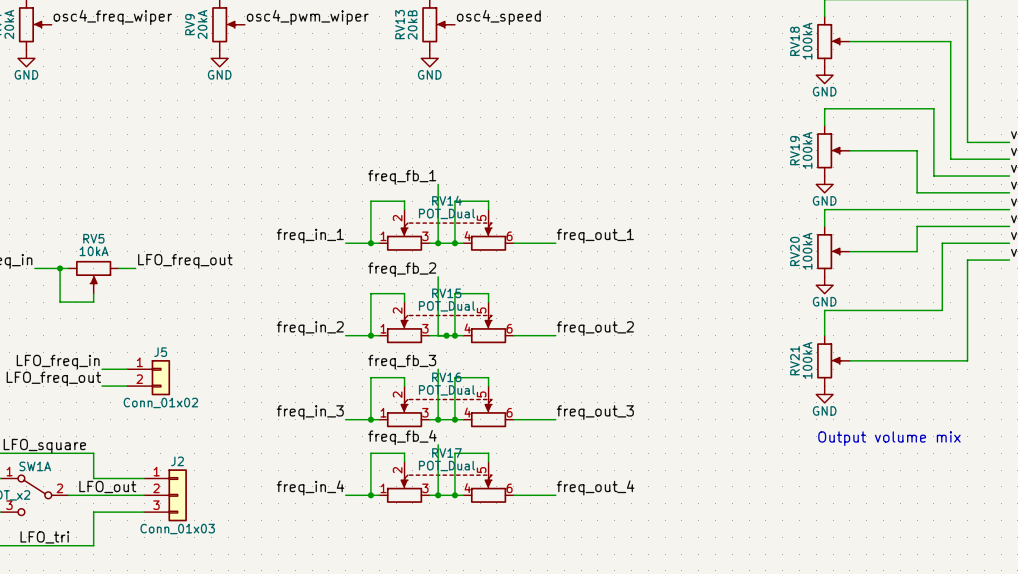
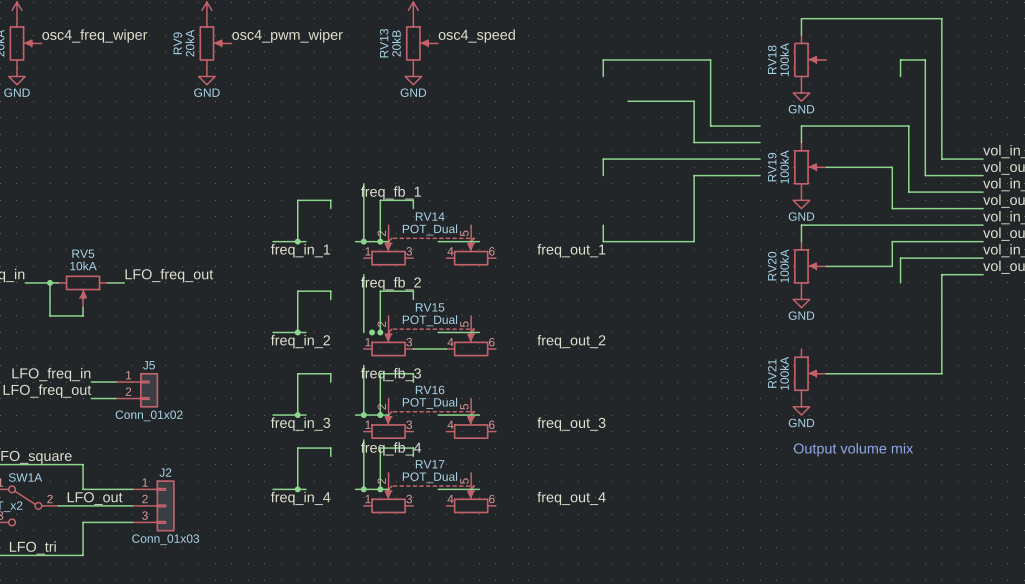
wire: (849, 41) (925, 41) -> (900, 76) (900, 59)
wire: none -> (603, 76) (603, 59) (710, 59) (710, 126) (760, 126)
wire: none -> (628, 101) (694, 101) (694, 142) (760, 142)
wire: none -> (760, 159) (603, 159) (603, 175)
wire: none -> (760, 175) (694, 175) (694, 241) (603, 241) (603, 225)
wire: (438, 184) (438, 243) -> (363, 183) (363, 241)
wire: (404, 209) (404, 201) (370, 201) (370, 243) -> (330, 208) (330, 200) (297, 200) (297, 241)
wire: (488, 209) (488, 201) (454, 201) (454, 243) -> (413, 208) (413, 200) (380, 200) (380, 241)
junction: none -> (297, 241)
junction: none -> (363, 241)
junction: none -> (380, 241)
wire: (345, 243) (379, 243) -> (272, 241) (306, 241)
junction: (370, 243) -> none
wire: (429, 243) (463, 243) -> (355, 241) (388, 241)
junction: (438, 243) -> none
junction: (454, 243) -> none
wire: (513, 243) (555, 243) -> (438, 241) (479, 241)
wire: (942, 243) (942, 310) (824, 310) (824, 335) -> (917, 258) (900, 258) (900, 282)
wire: (438, 276) (438, 335) -> (363, 274) (363, 332)
wire: (404, 302) (404, 293) (370, 293) (370, 335) -> (330, 299) (330, 291) (297, 291) (297, 332)
wire: (488, 302) (488, 293) (454, 293) (454, 335) -> (413, 299) (413, 291) (380, 291) (380, 332)
junction: none -> (297, 332)
junction: none -> (372, 332)
junction: none -> (380, 332)
wire: (345, 335) (379, 335) -> (272, 332) (306, 332)
junction: (370, 335) -> none
junction: (446, 335) -> none
junction: (454, 335) -> none
wire: (513, 335) (555, 335) -> (438, 332) (479, 332)
wire: (438, 369) (438, 419) -> (363, 365) (363, 415)
wire: (404, 386) (404, 377) (370, 377) (370, 419) -> (330, 382) (330, 373) (297, 373) (297, 415)
wire: (488, 386) (488, 377) (454, 377) (454, 419) -> (413, 382) (413, 373) (380, 373) (380, 415)
junction: none -> (297, 415)
junction: none -> (363, 415)
junction: none -> (380, 415)
wire: (345, 419) (379, 419) -> (272, 415) (306, 415)
junction: (370, 419) -> none
wire: (429, 419) (463, 419) -> (355, 415) (388, 415)
junction: (438, 419) -> none
junction: (454, 419) -> none
wire: (513, 419) (555, 419) -> (438, 415) (479, 415)
wire: (438, 444) (438, 495) -> (363, 439) (363, 489)
wire: (404, 461) (404, 453) (370, 453) (370, 495) -> (330, 456) (330, 448) (297, 448) (297, 489)
wire: (488, 461) (488, 453) (454, 453) (454, 495) -> (413, 456) (413, 448) (380, 448) (380, 489)
junction: none -> (297, 489)
junction: none -> (363, 489)
junction: none -> (380, 489)
wire: (345, 495) (379, 495) -> (272, 489) (306, 489)
junction: (370, 495) -> none
wire: (429, 495) (463, 495) -> (355, 489) (388, 489)
junction: (438, 495) -> none
junction: (454, 495) -> none
wire: (513, 495) (555, 495) -> (438, 489) (479, 489)

